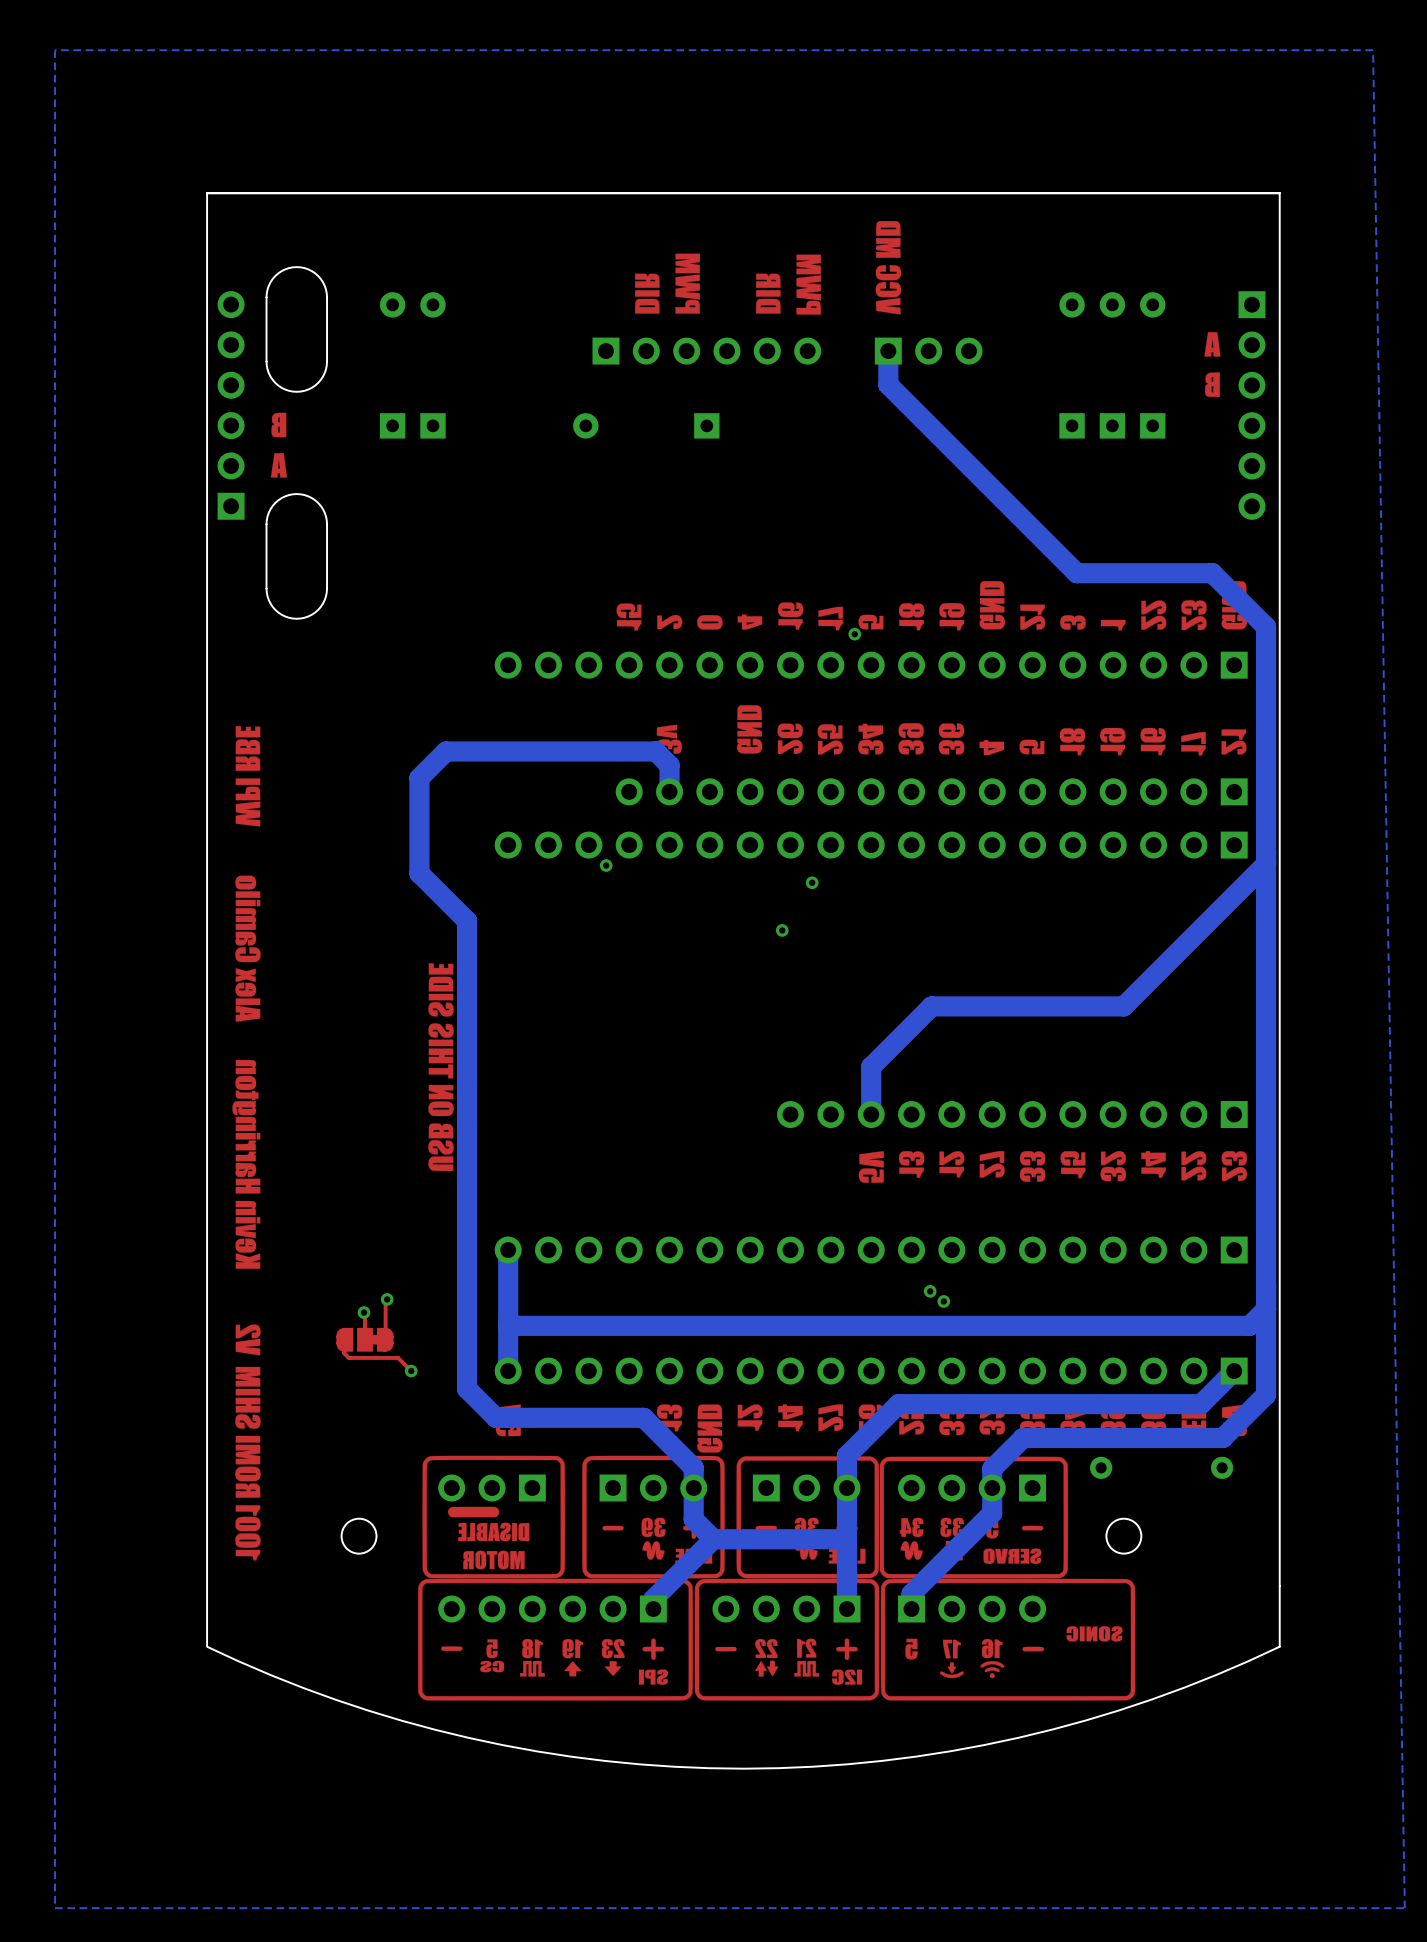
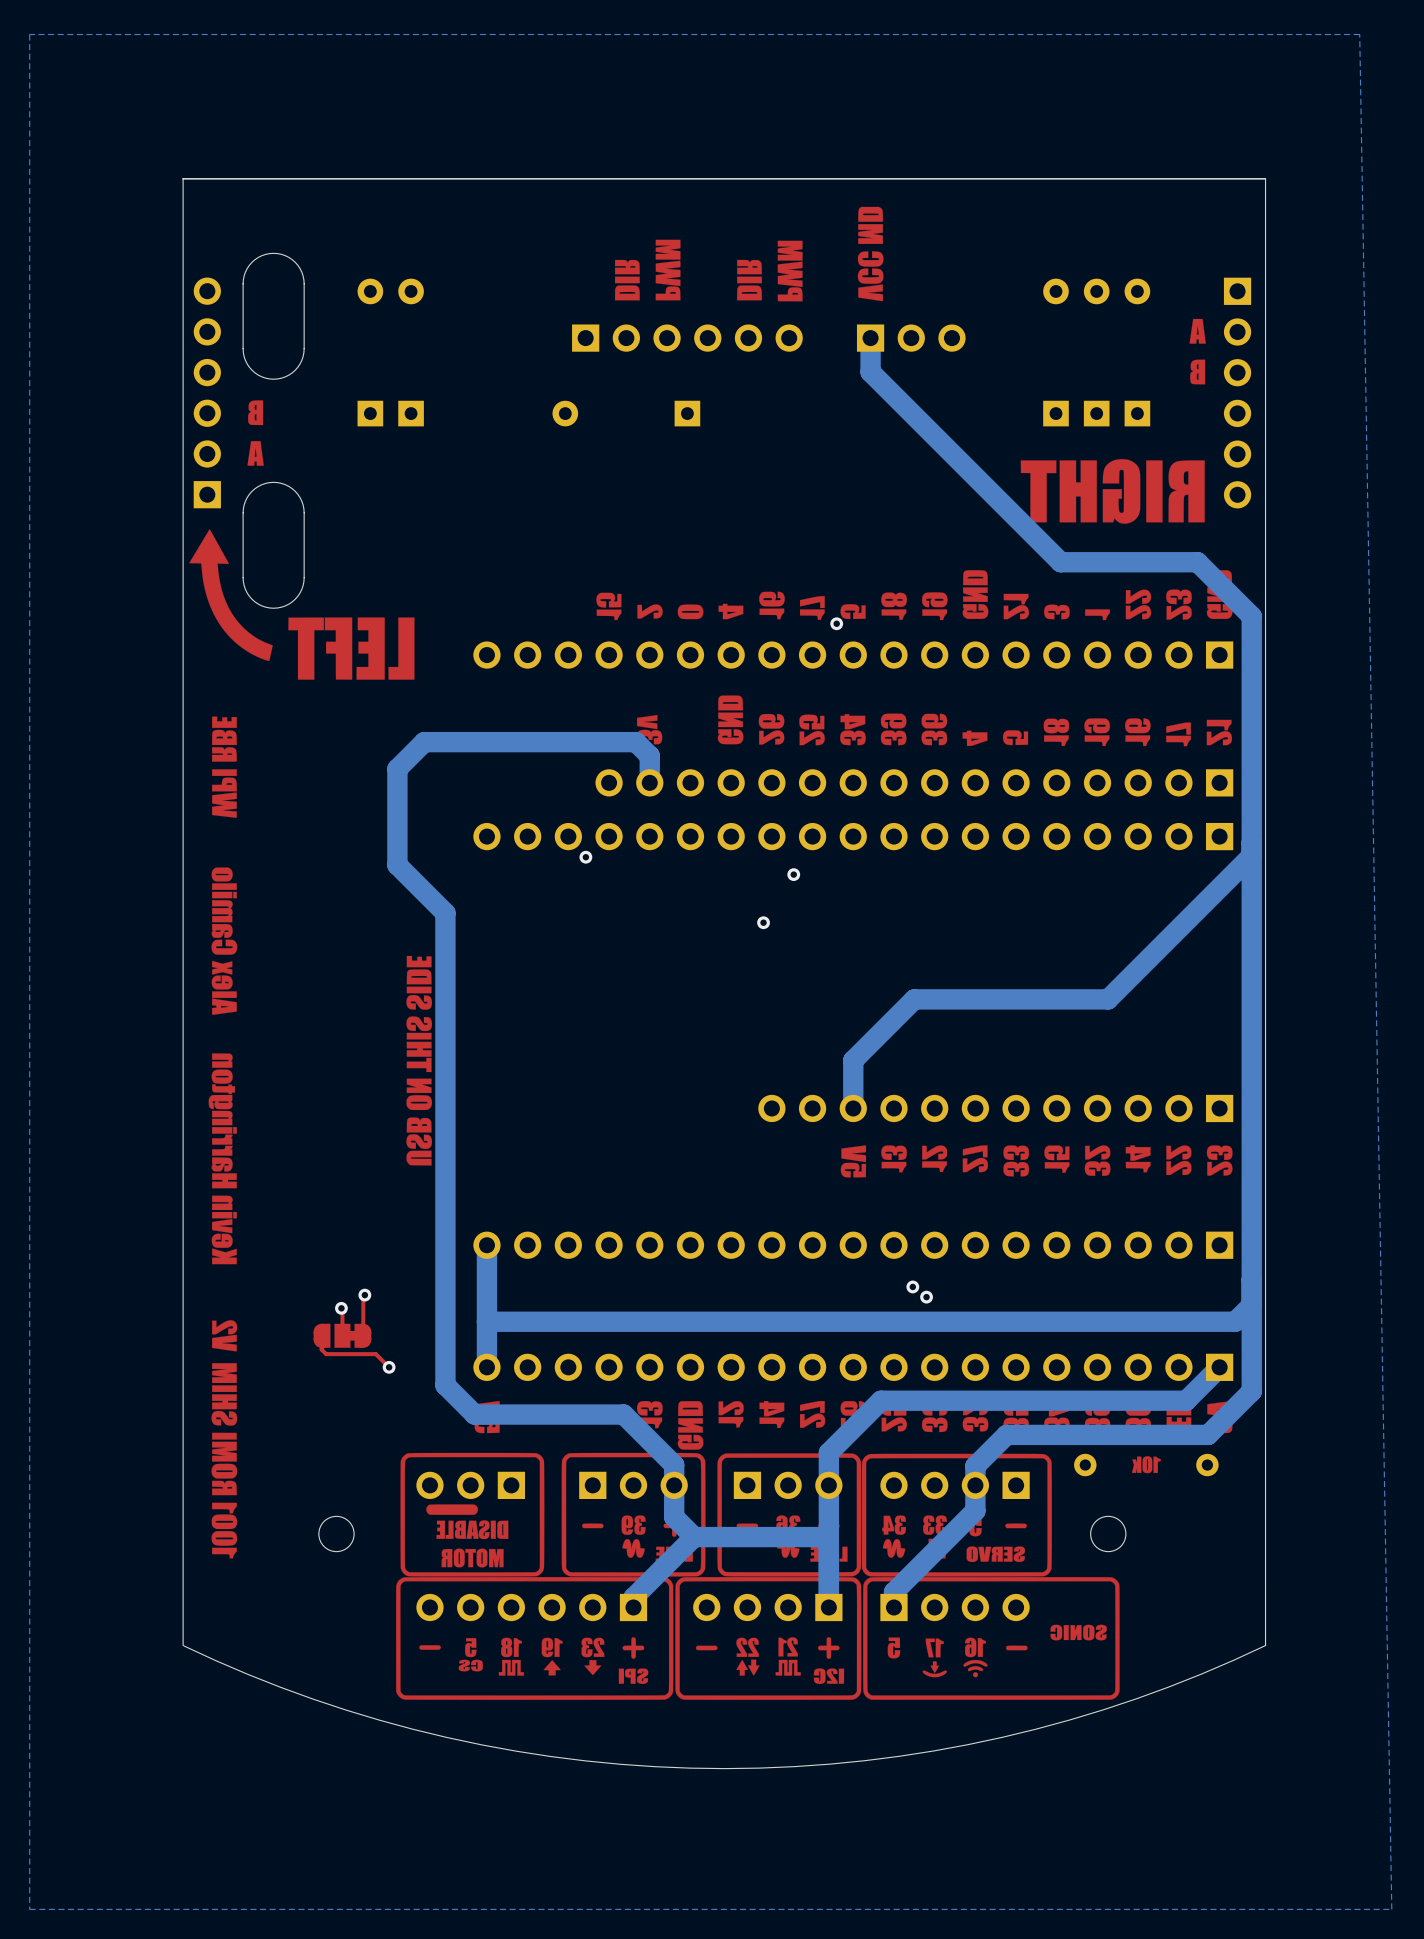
drawing shape: [232, 221, 1248, 1701] -> [189, 206, 1233, 1700]

